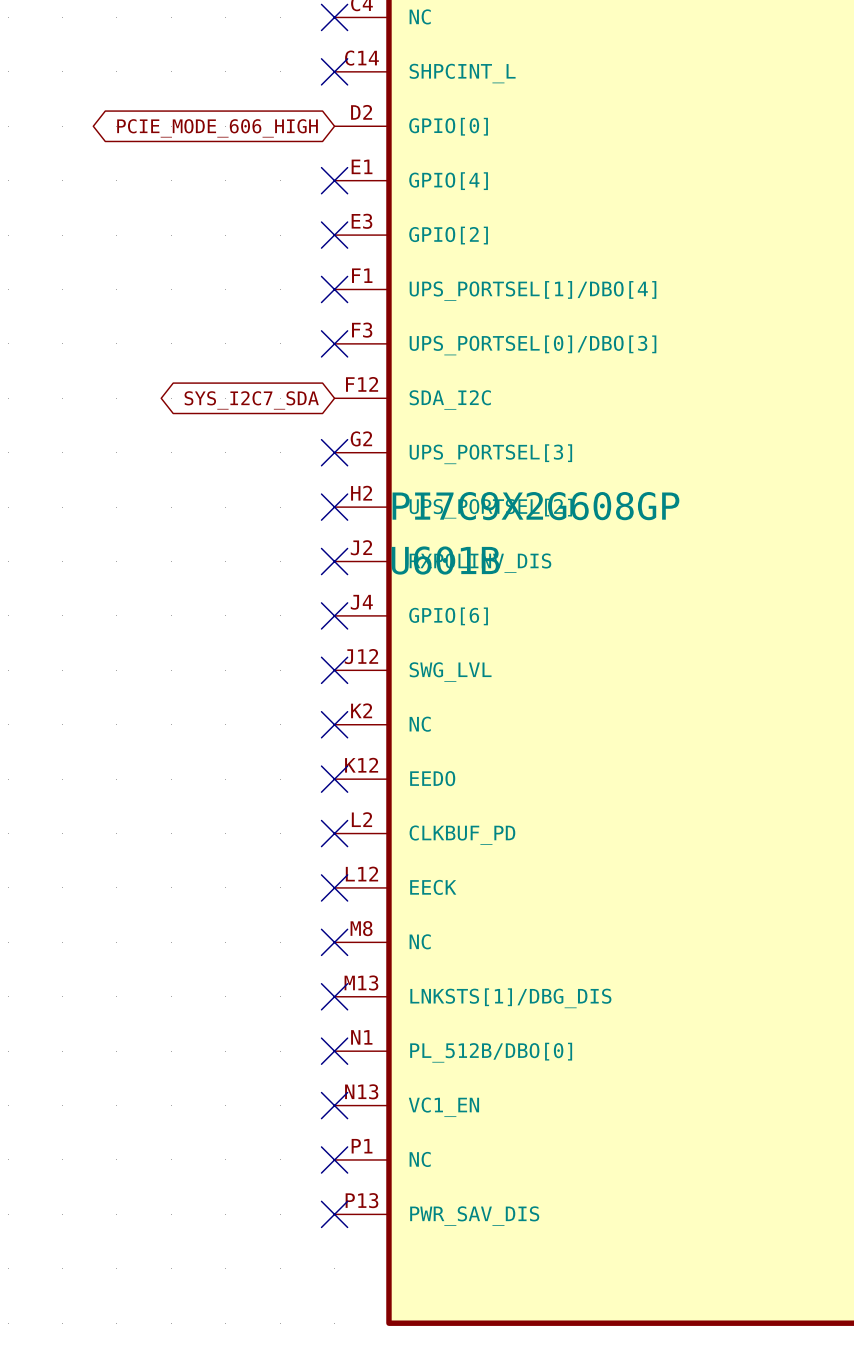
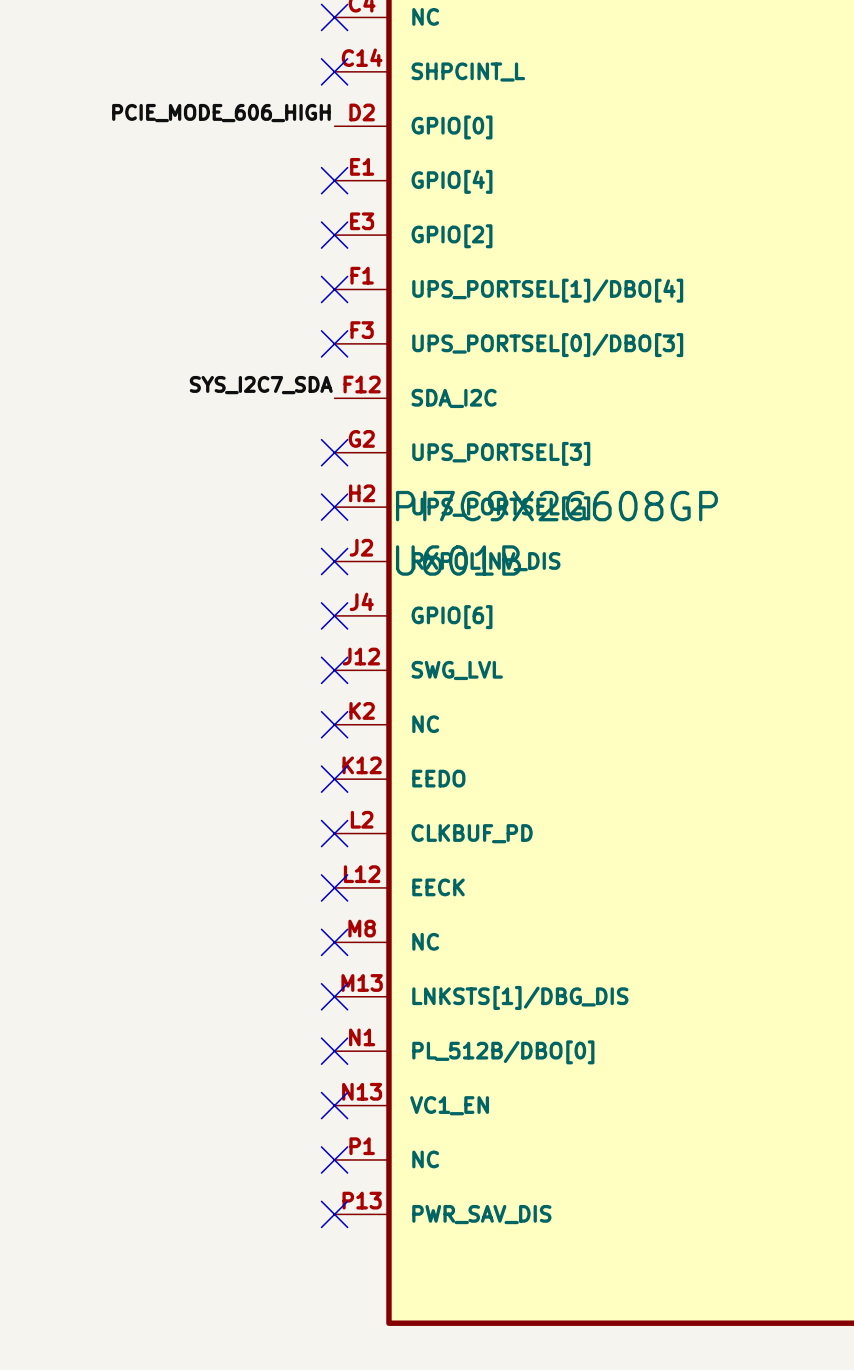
label: none -> PCIE_MODE_606_HIGH (221, 113)
global label: PCIE_MODE_606_HIGH (217, 128) -> none
label: none -> SYS_I2C7_SDA (261, 385)
global label: SYS_I2C7_SDA (251, 400) -> none

